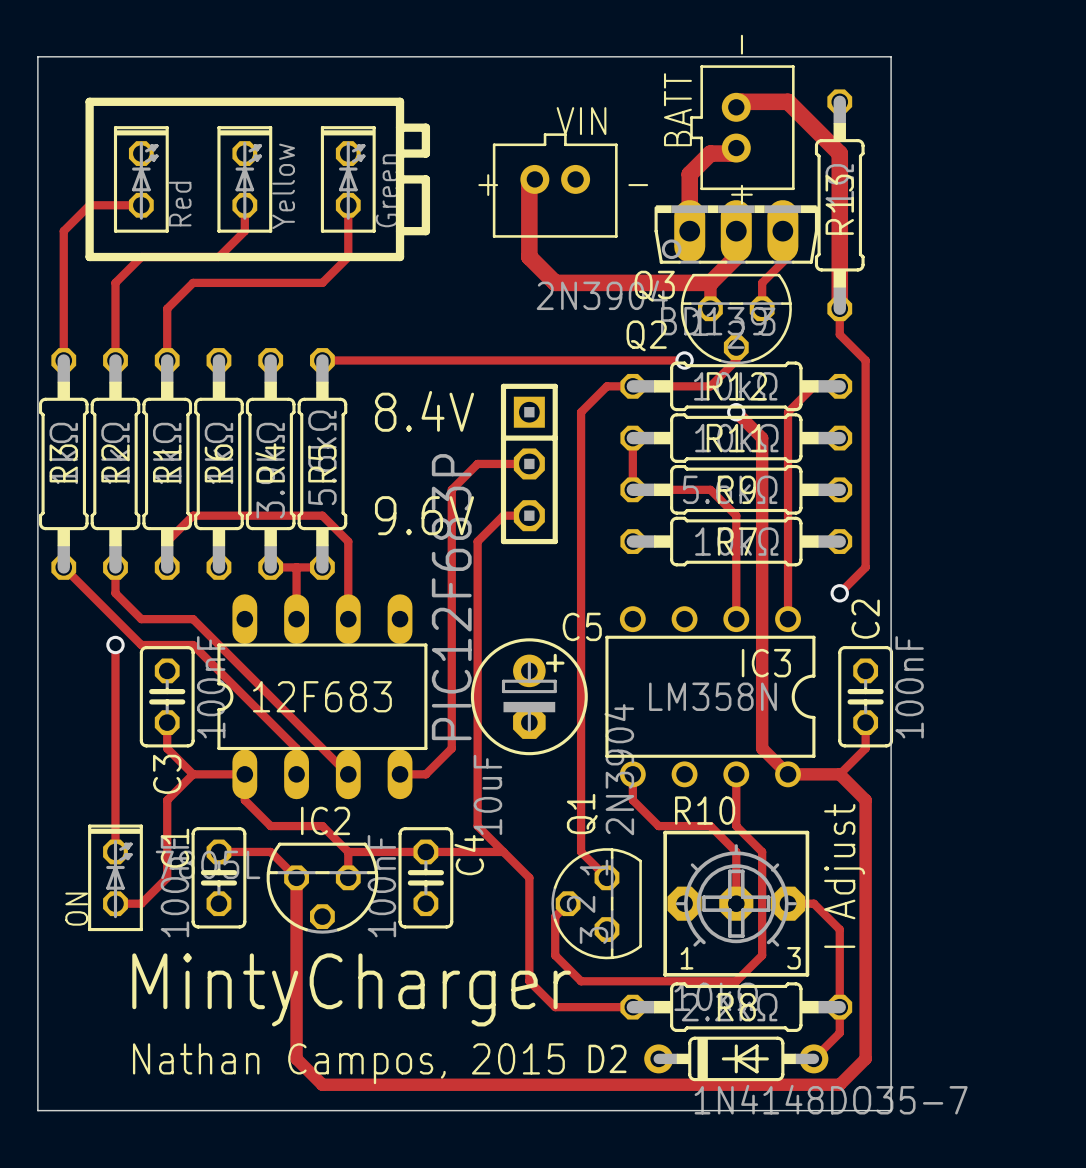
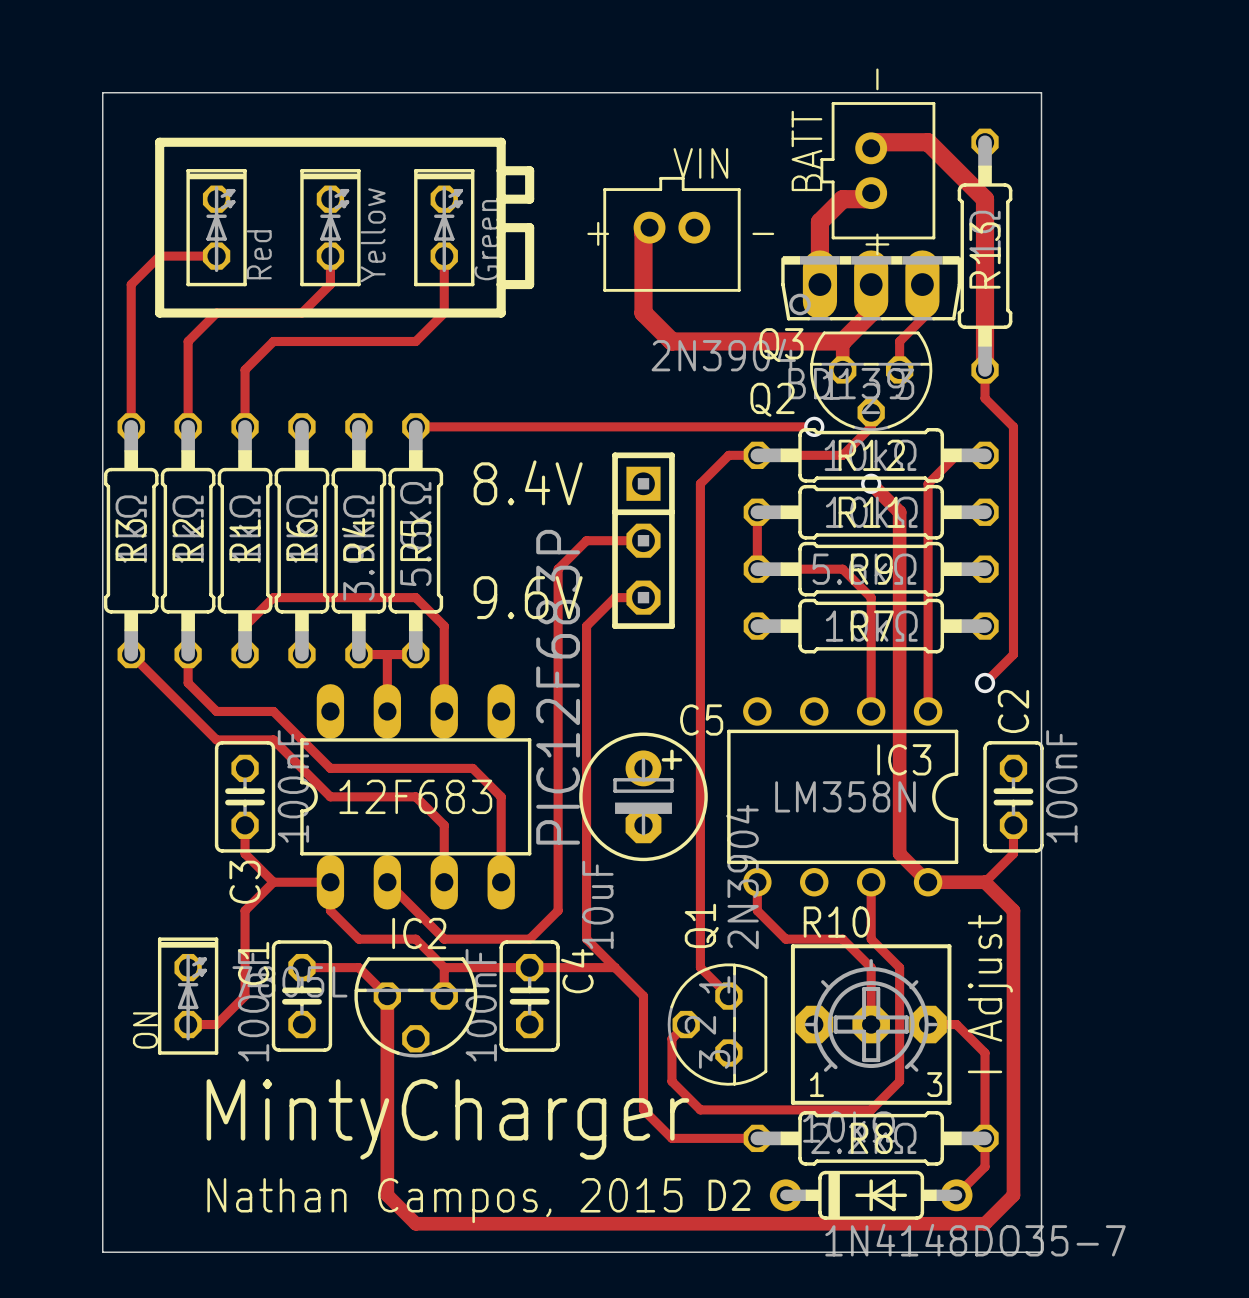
track: (115, 645) (115, 851) -> none
via: (115, 645) -> none
track: (244, 670) (348, 774) -> (330, 796) (415, 796) (444, 825) (444, 882)
track: none -> (330, 768) (472, 768) (501, 796) (501, 882)
track: (244, 696) (296, 748) (296, 774) -> none
track: (451, 748) (425, 774) (400, 774) -> (558, 853) (558, 910) (529, 939) (444, 939) (387, 882)

